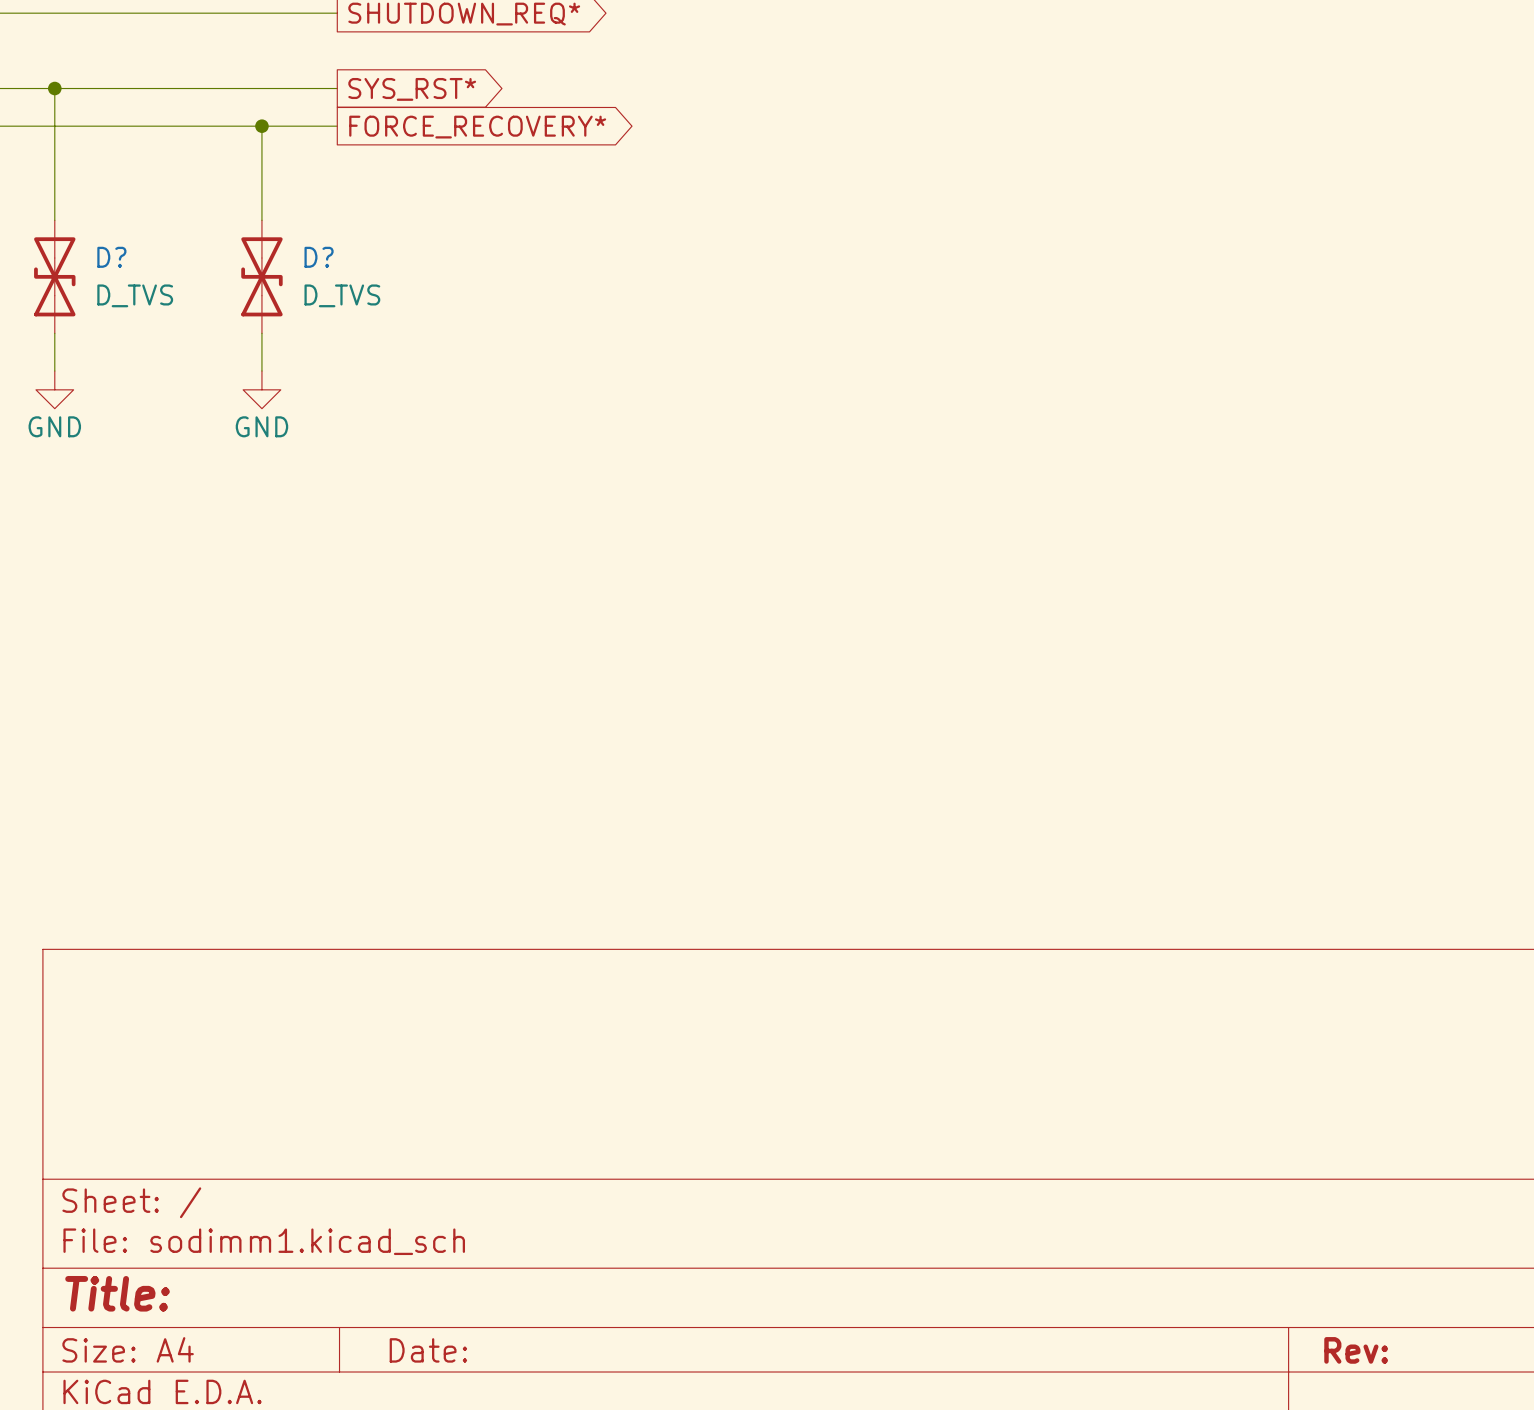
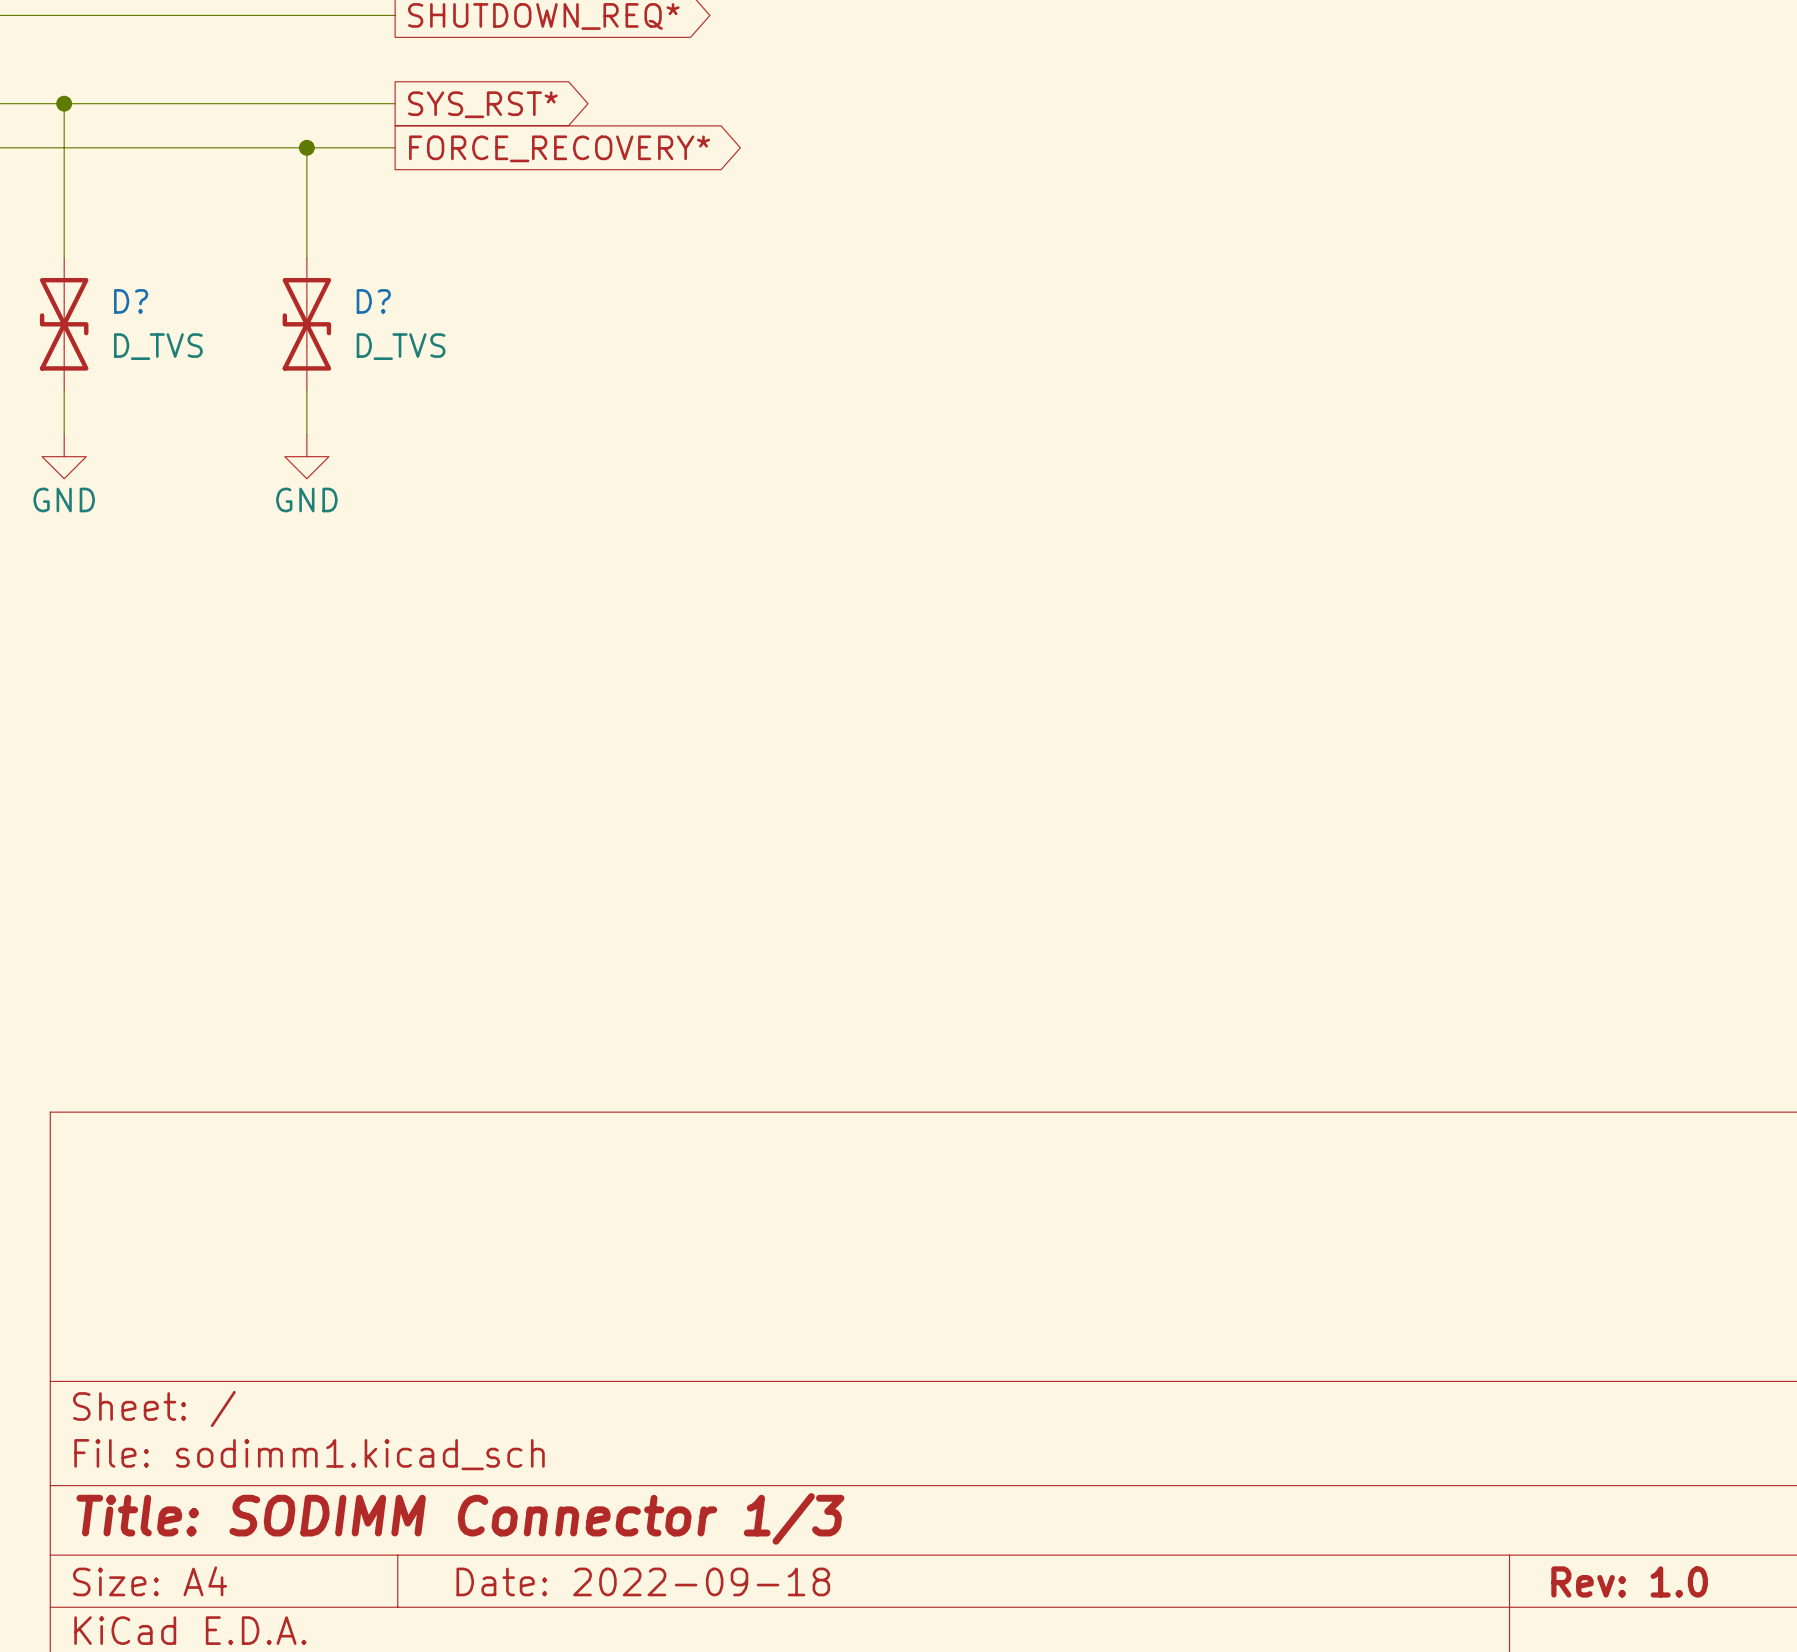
title block: Title: (117, 1293) -> Title: SODIMM Connector 1/3 (460, 1518)
title block: Date: (428, 1350) -> Date: 2022-09-18 (643, 1581)
title block: Rev: (1356, 1350) -> Rev: 1.0 (1629, 1581)

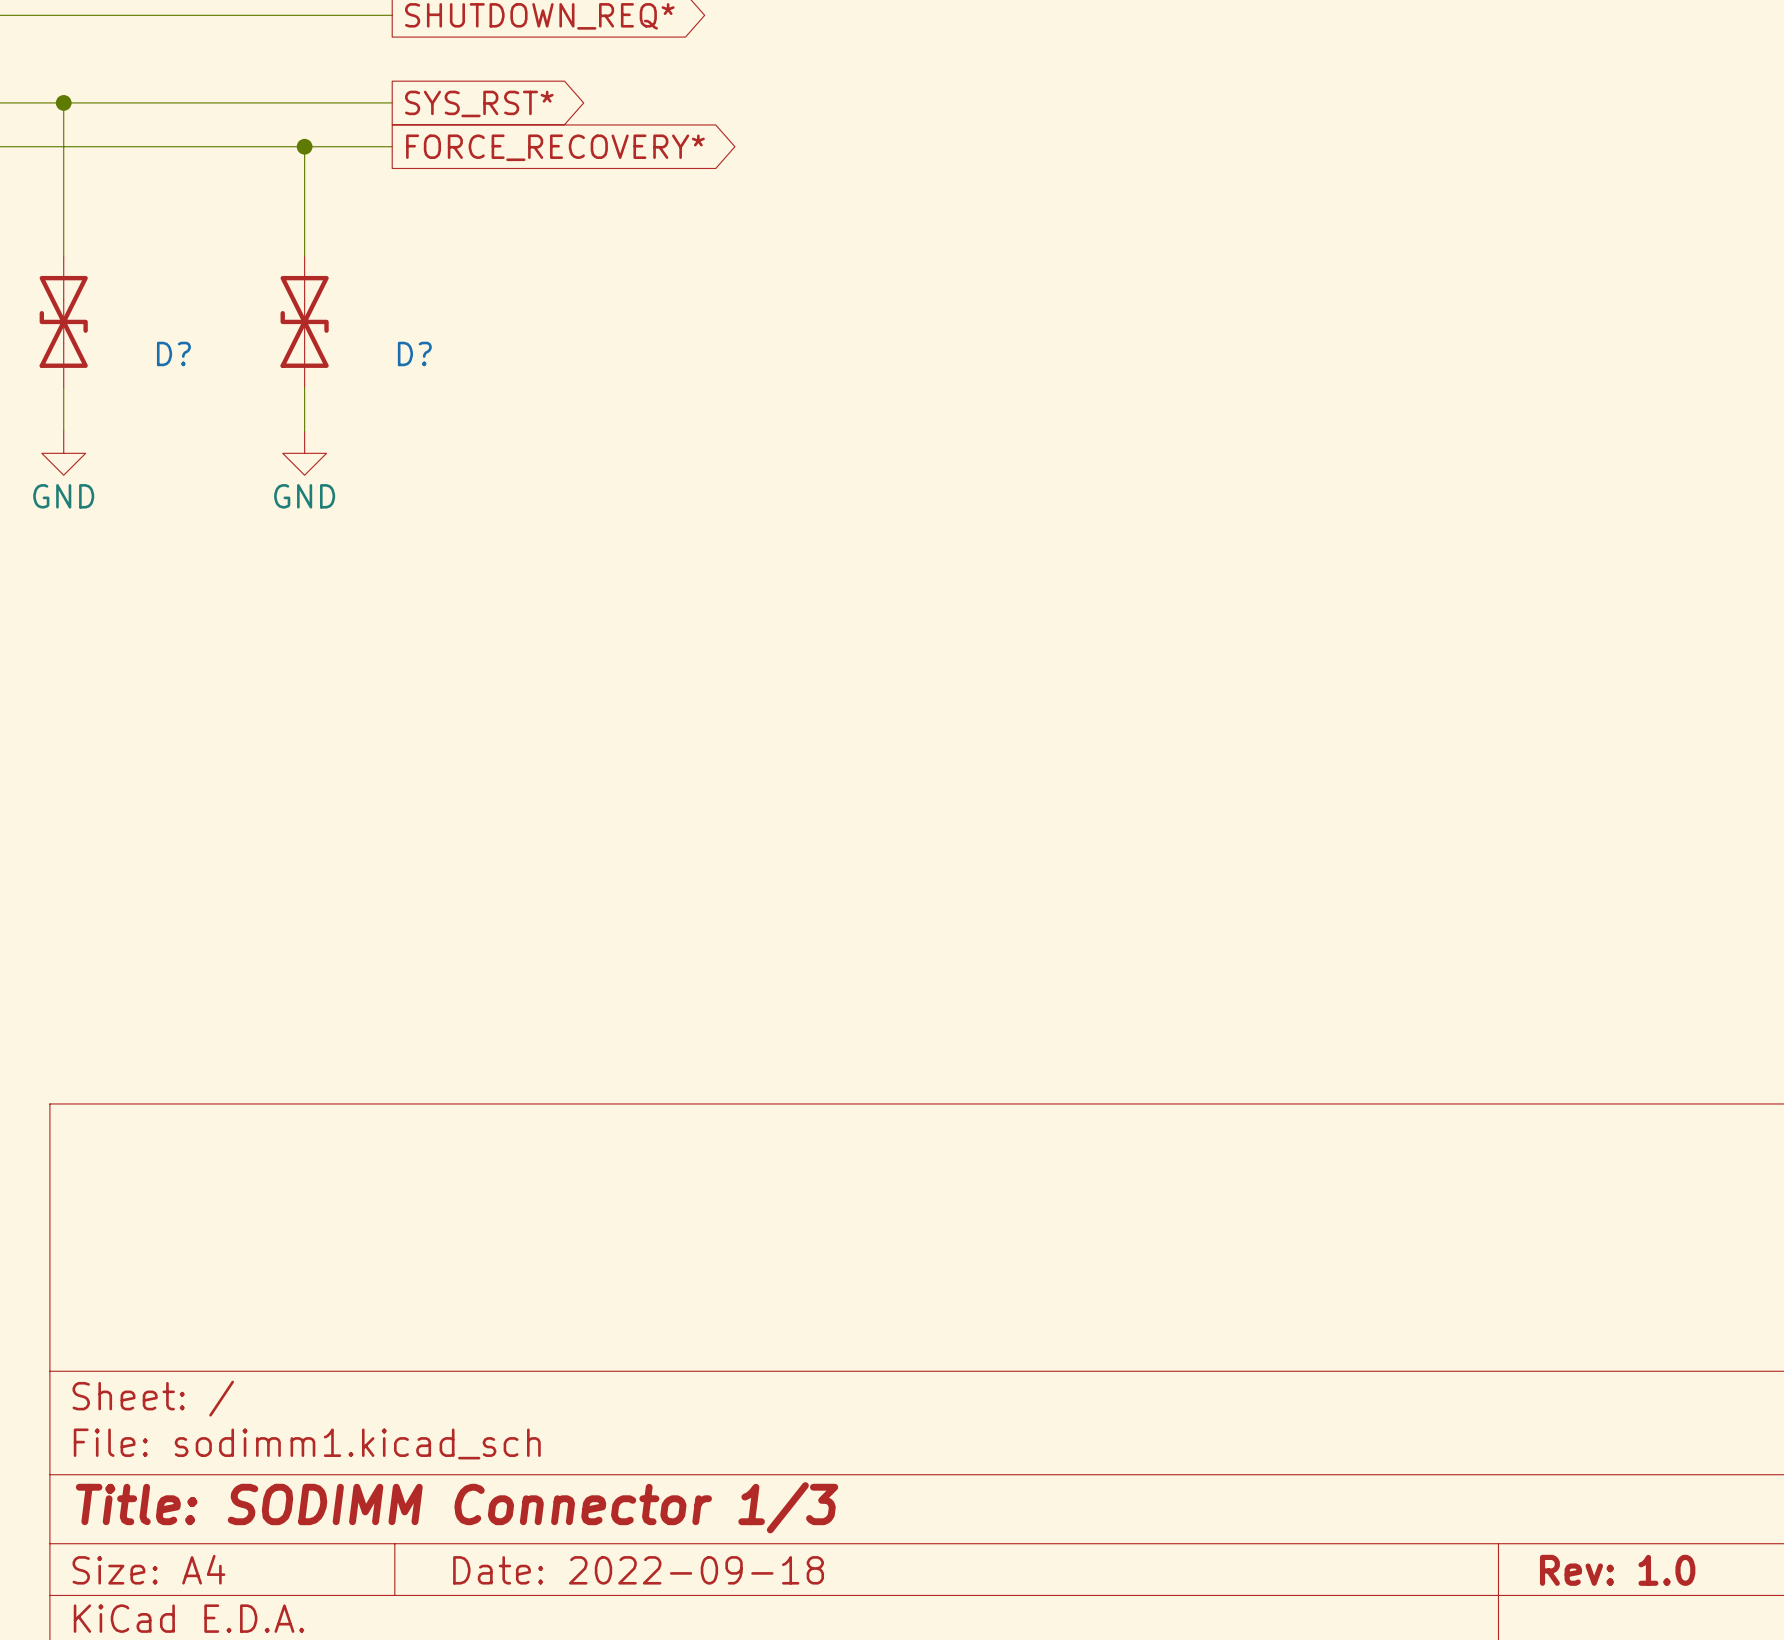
D? name position: D? (131, 301) -> D? (173, 353)
D? name position: D? (373, 301) -> D? (414, 353)
D? value: D_TVS (158, 346) -> none
D? value: D_TVS (401, 346) -> none

